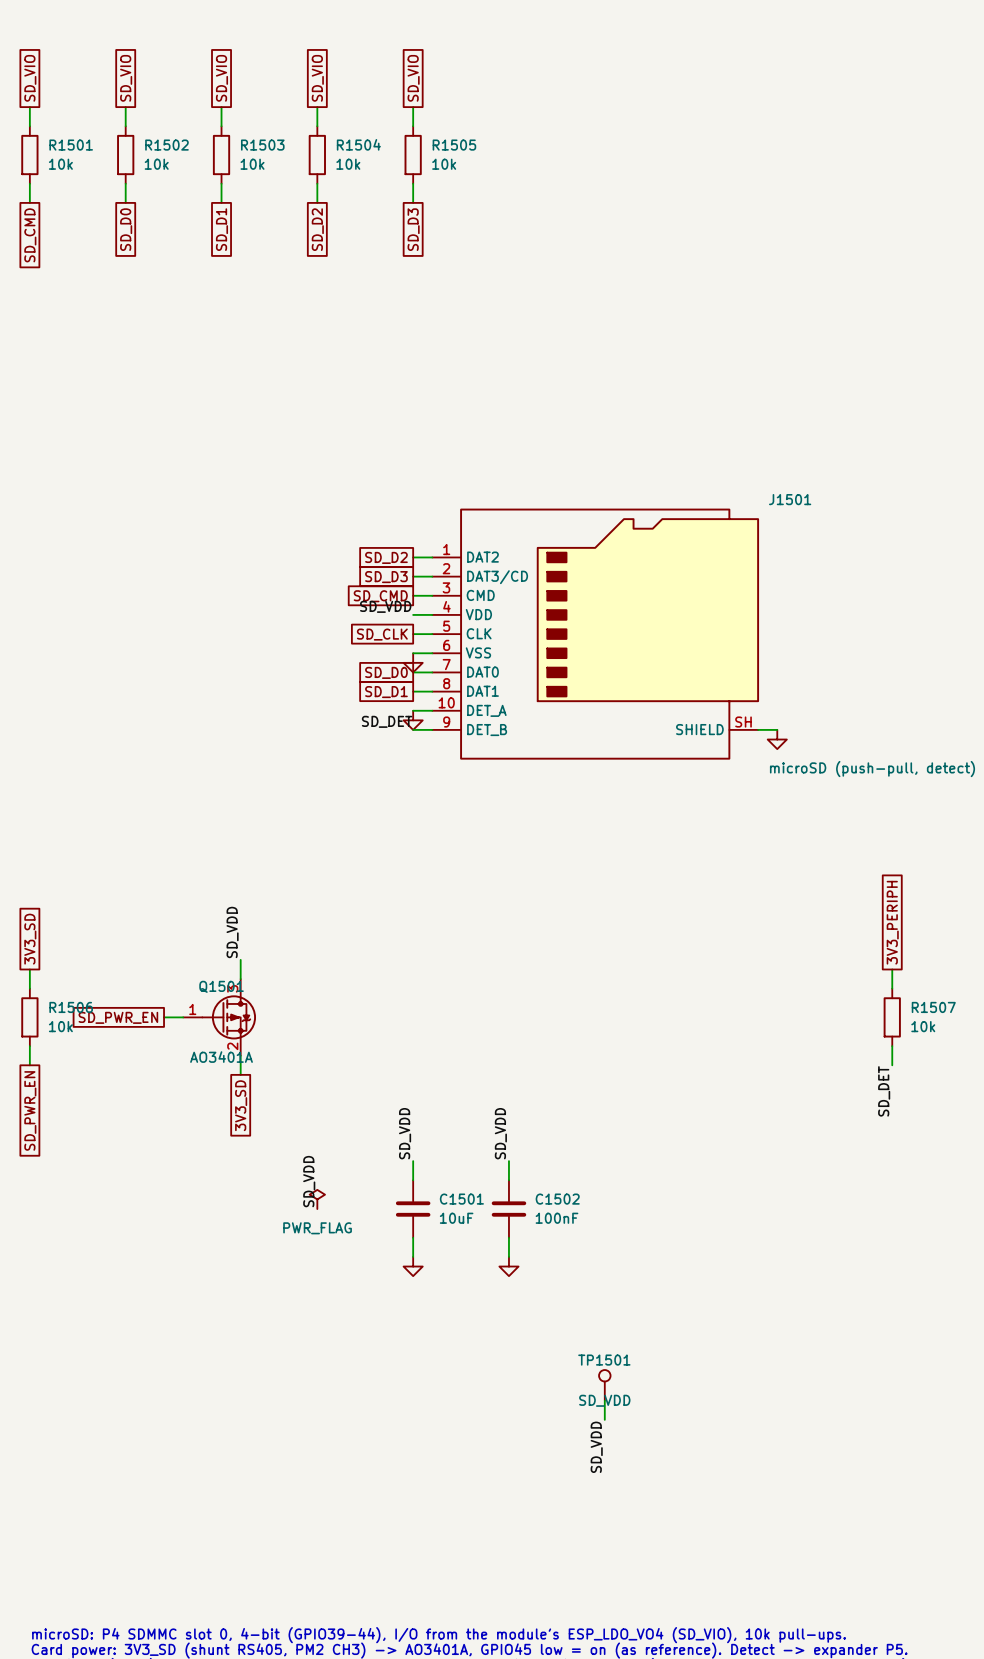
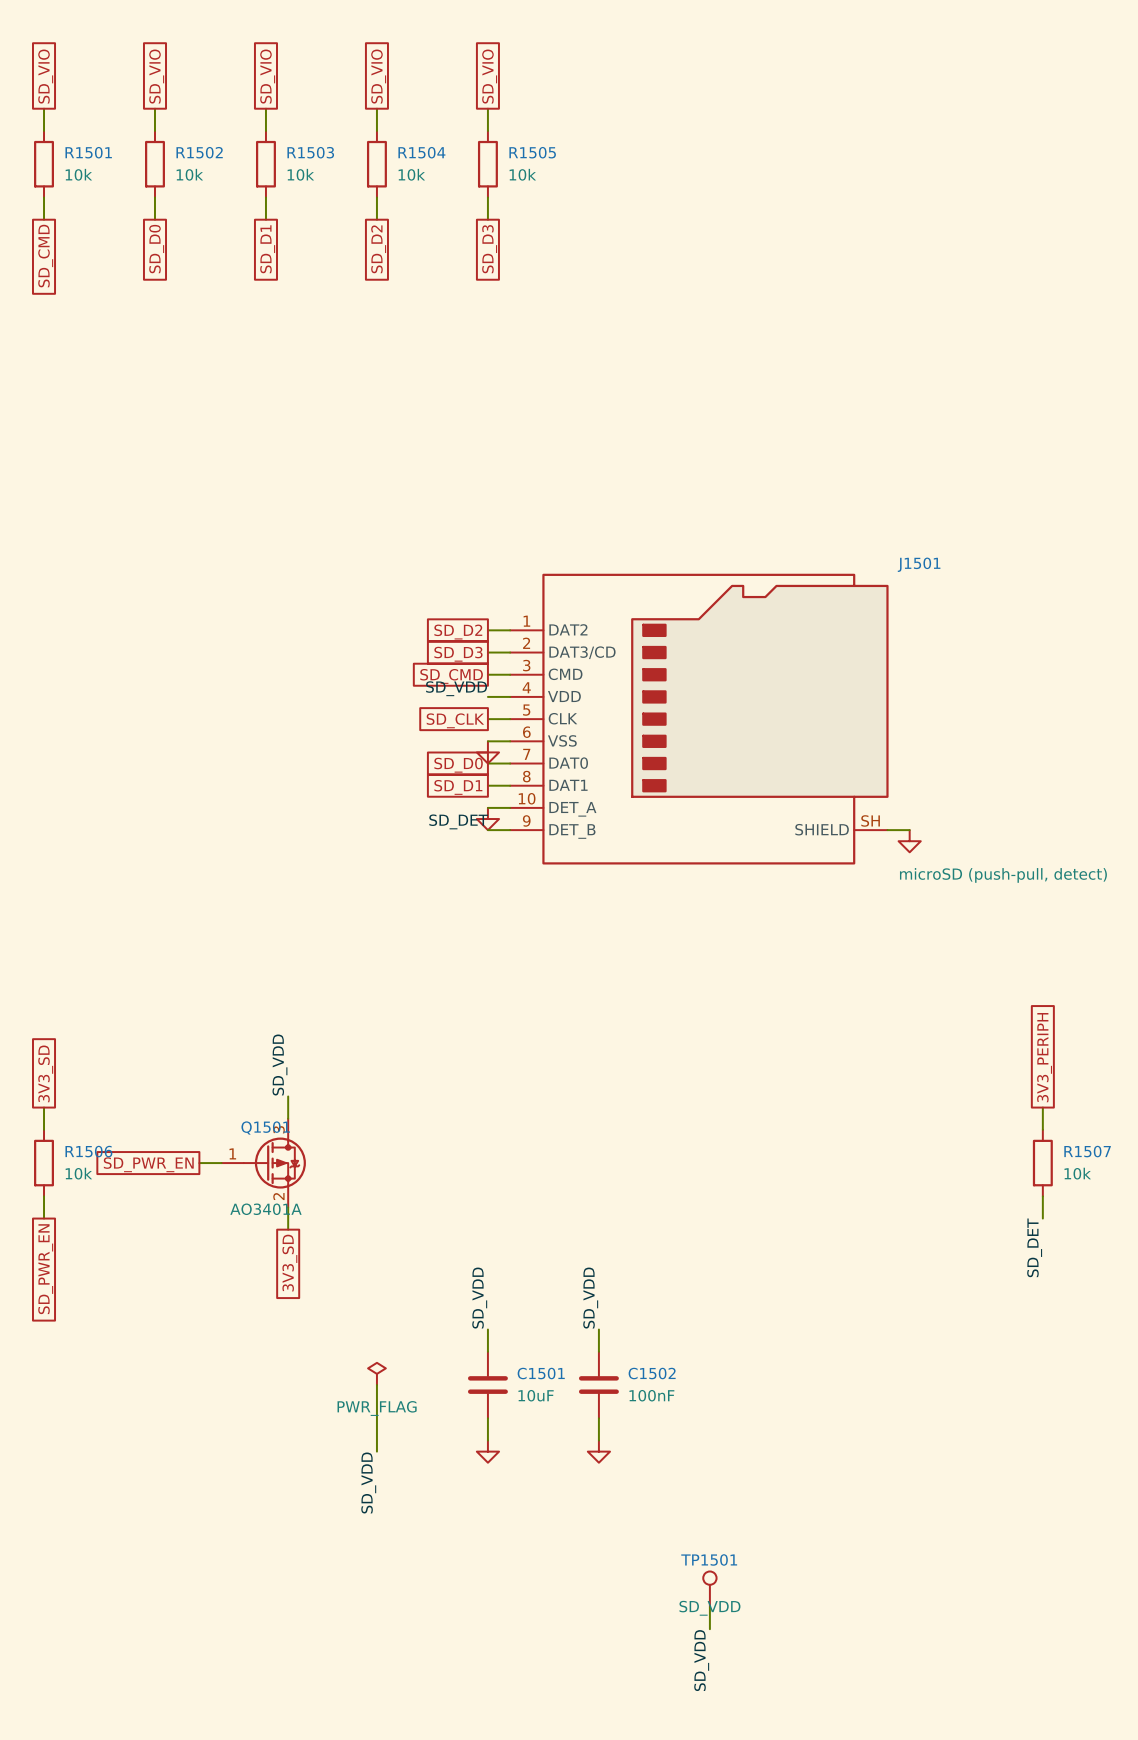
label position: SD_VDD (309, 1181) -> SD_VDD (368, 1482)
wire: none -> (376, 1385) (376, 1451)

